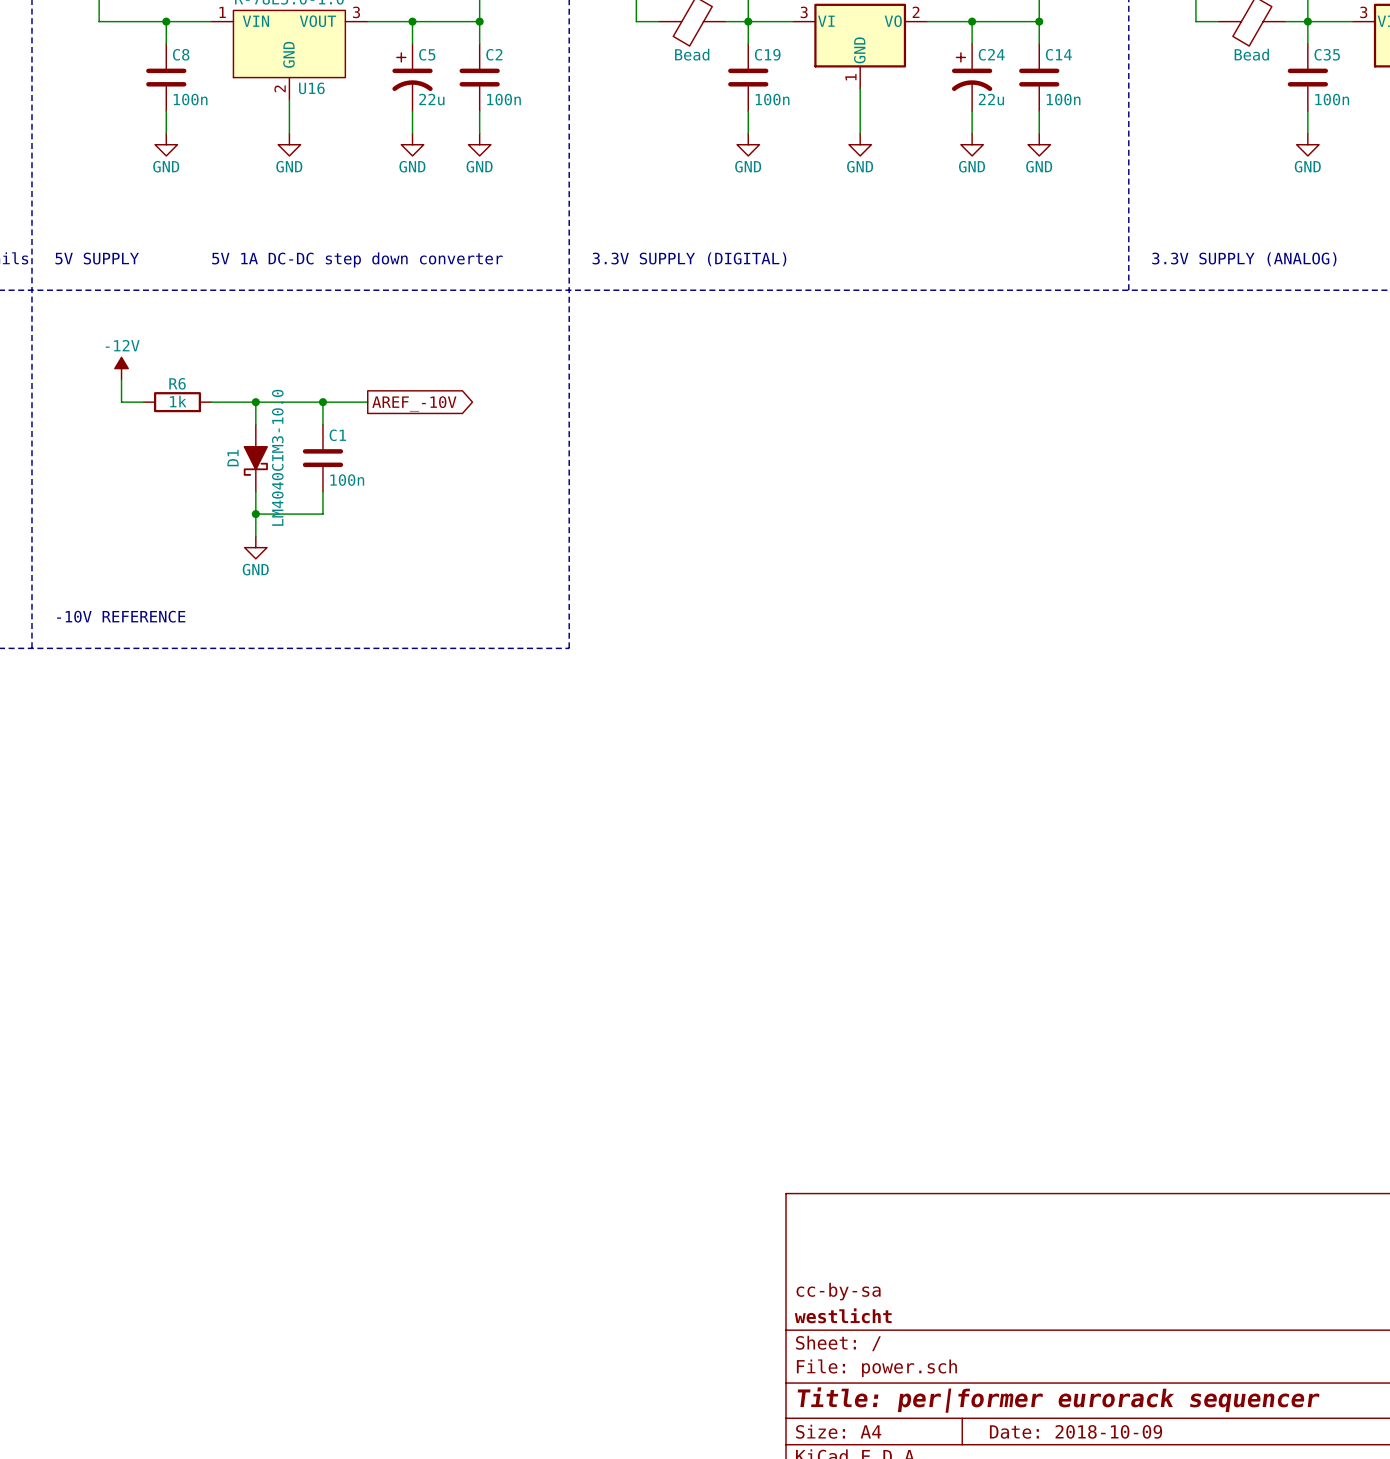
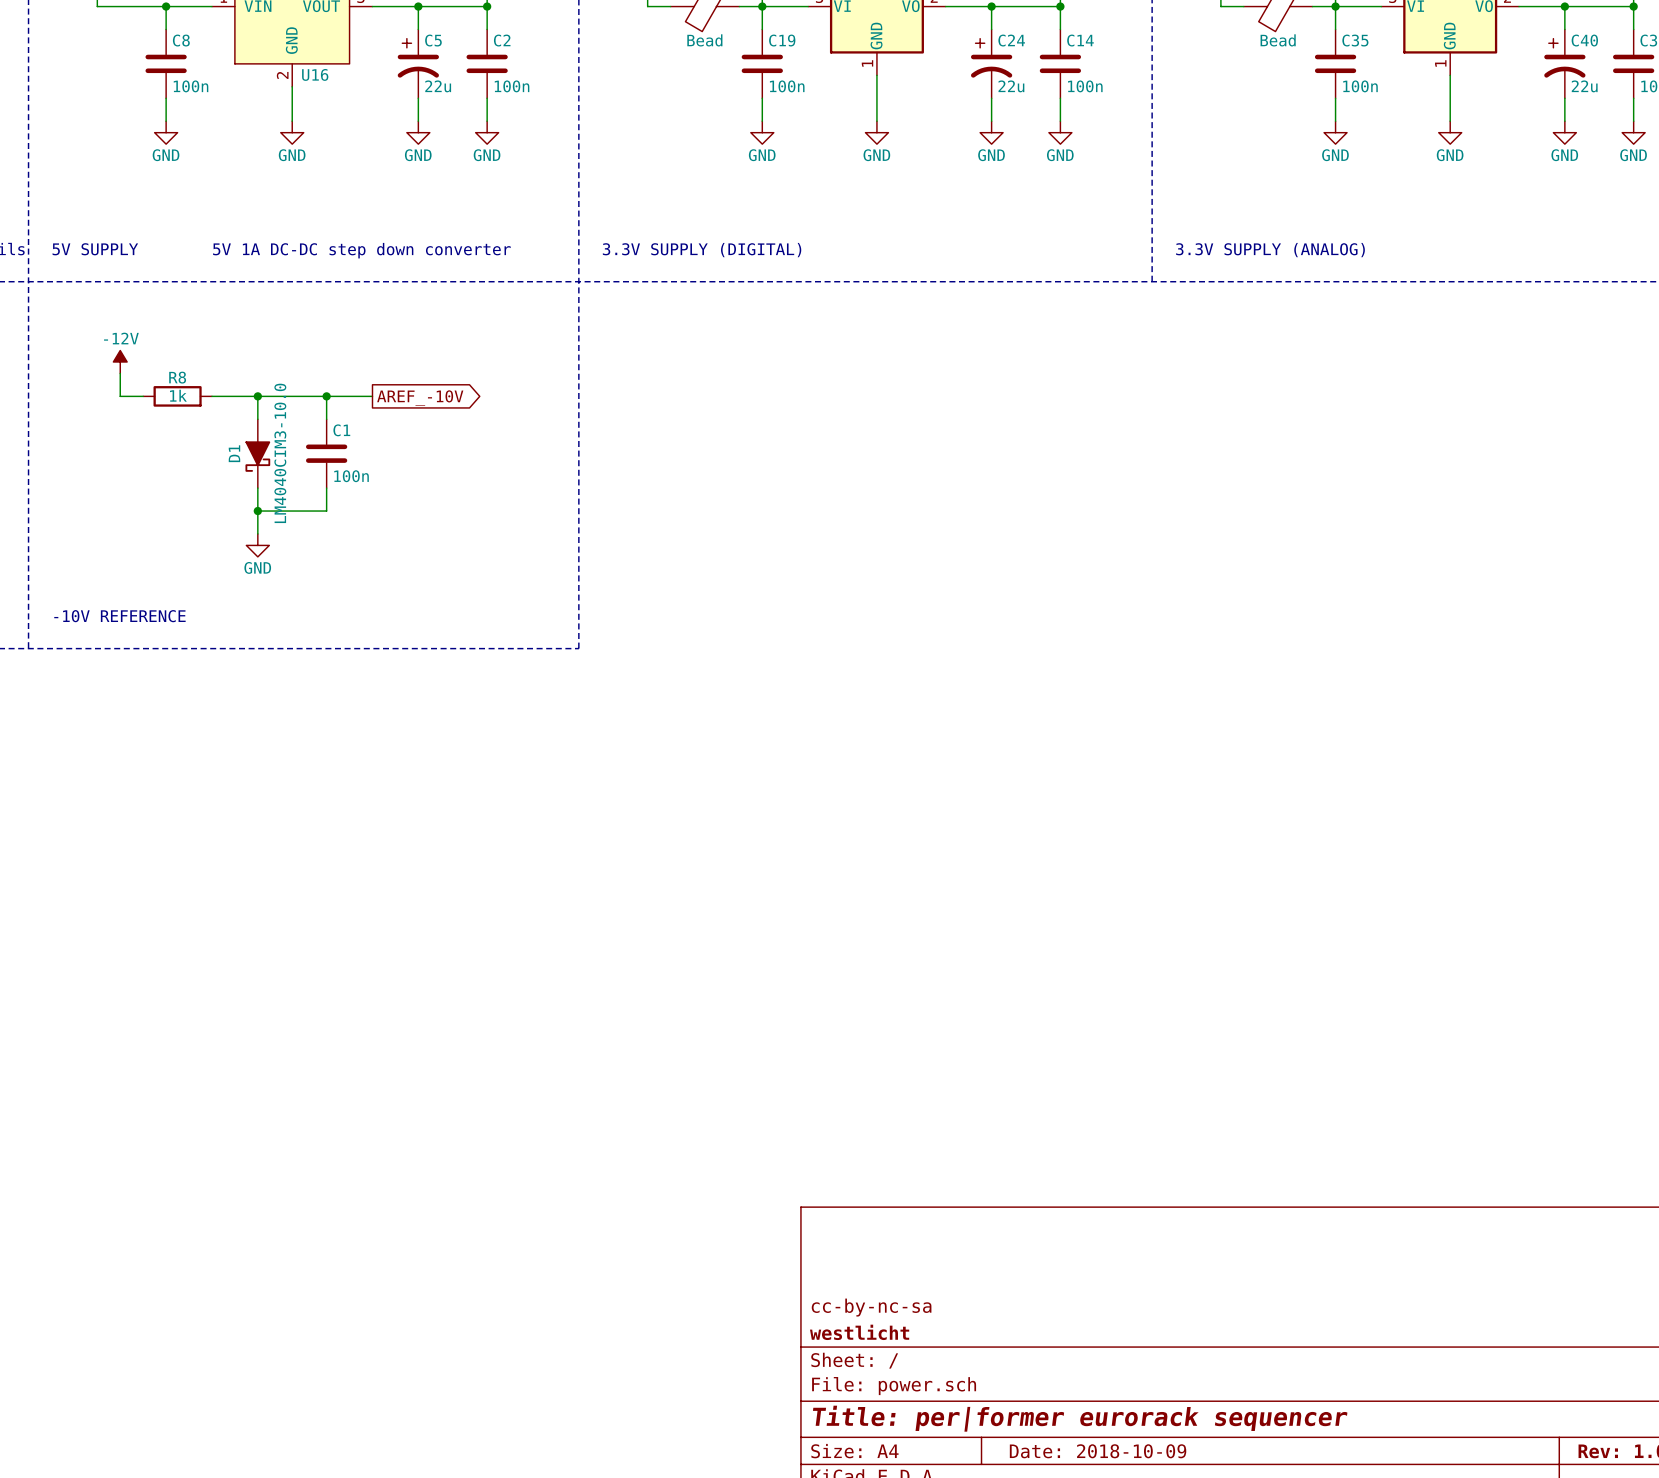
R6 name: R6 (177, 383) -> R8 (177, 377)
title block: cc-by-sa (838, 1291) -> cc-by-nc-sa (871, 1307)

